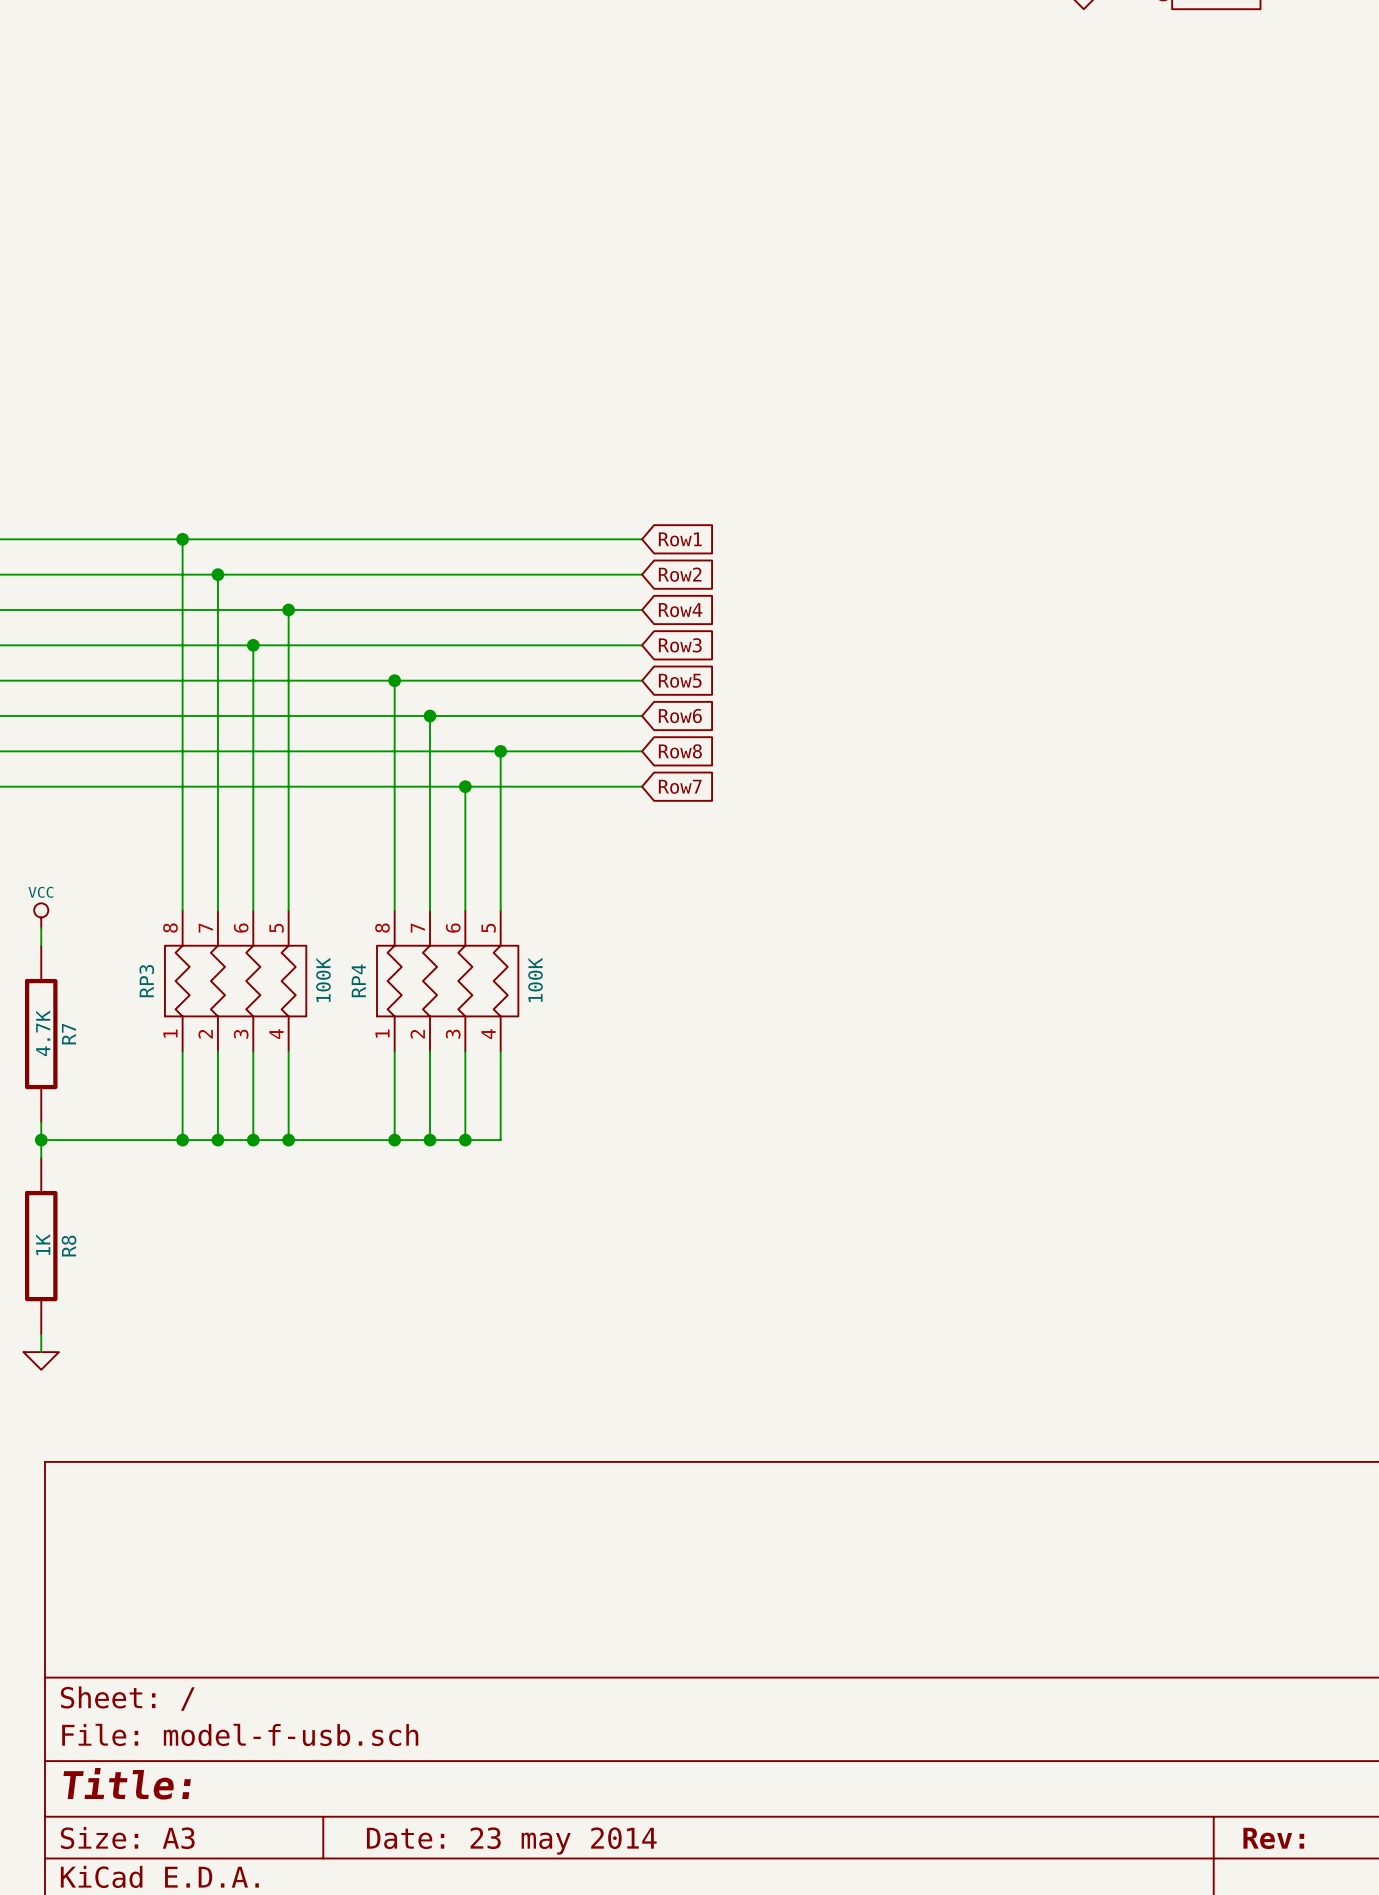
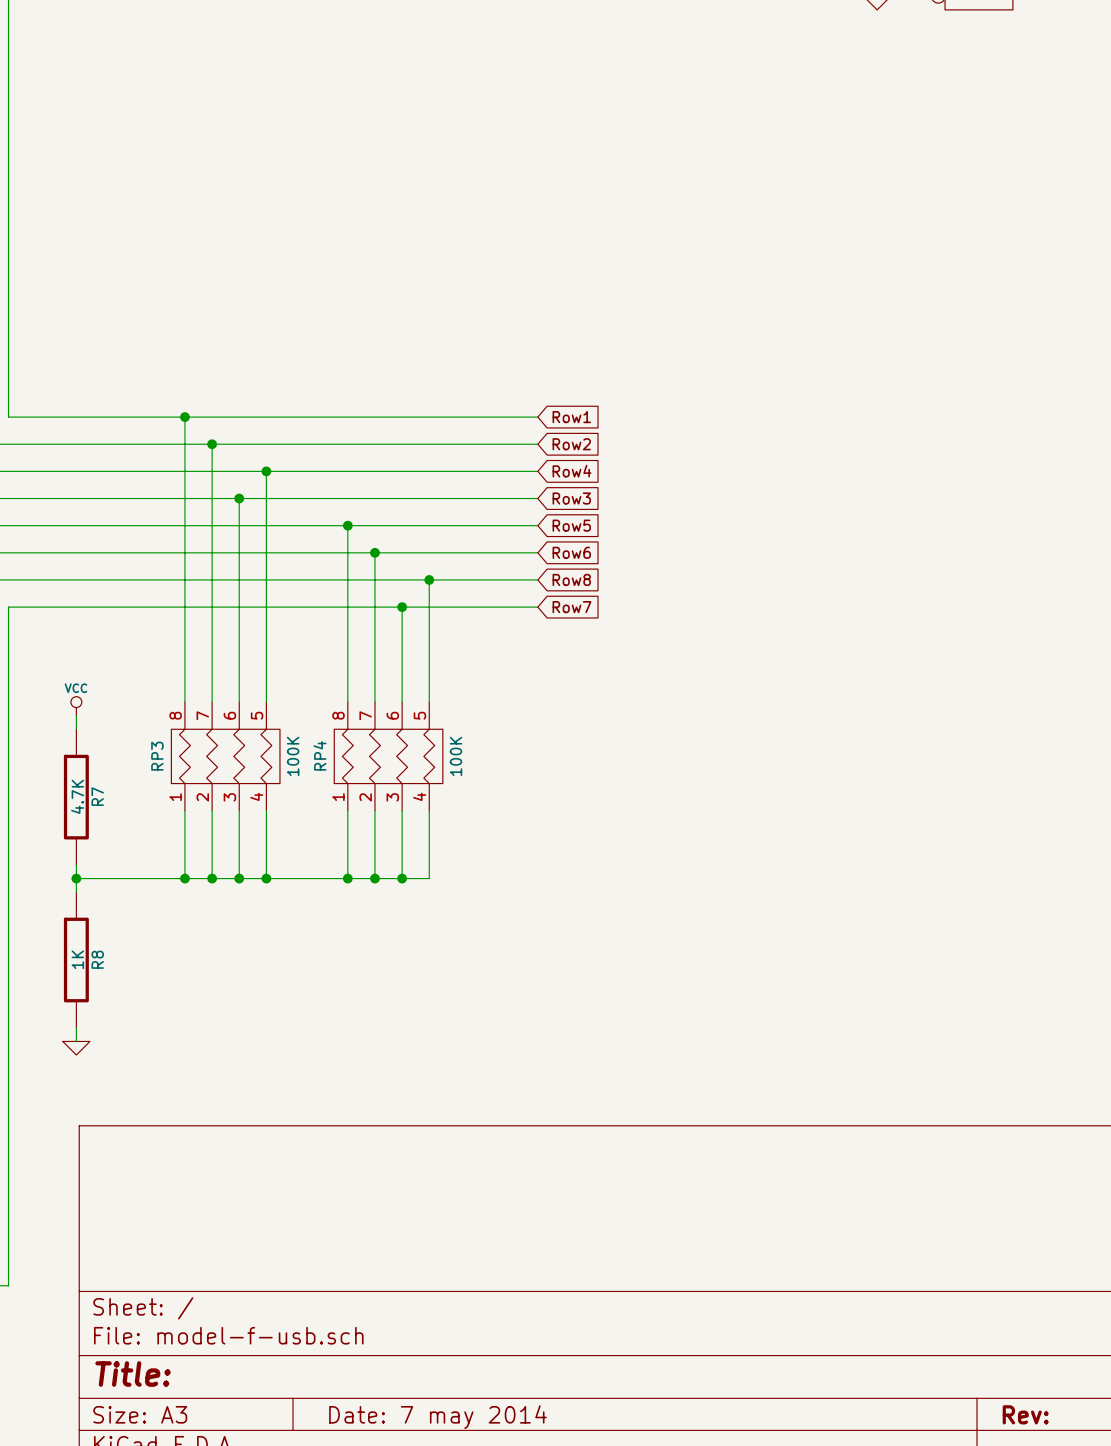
title block: Date: 23 may 2014 (511, 1841) -> Date: 7 may 2014 (437, 1417)

